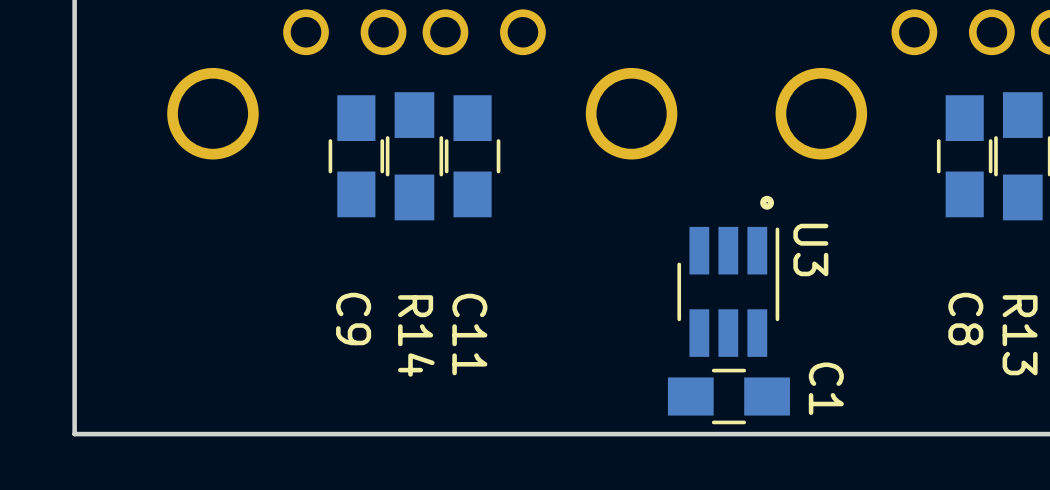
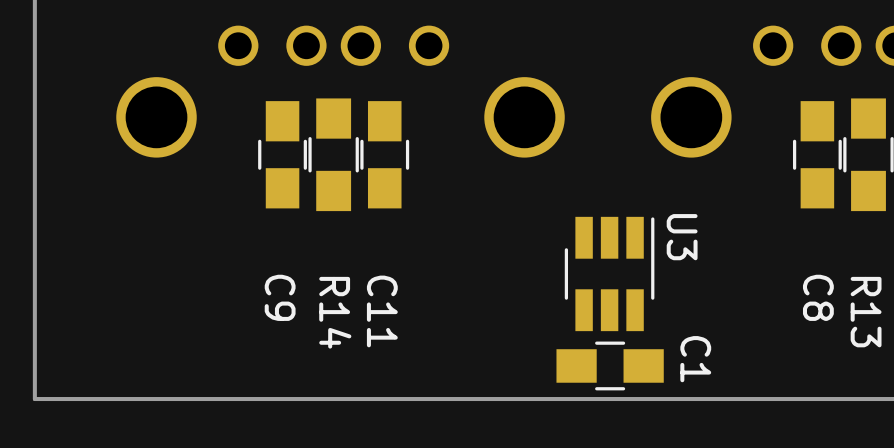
drawing: [760, 195, 775, 210] -> none

